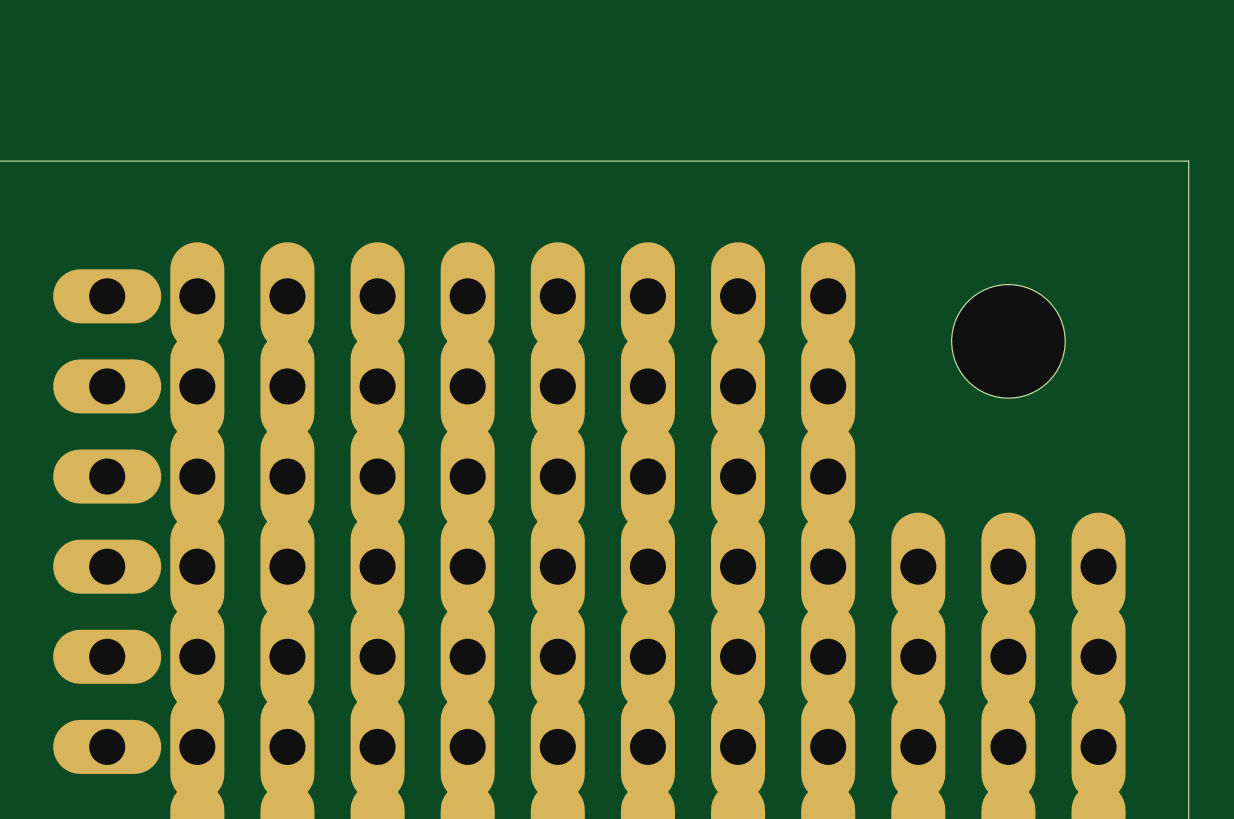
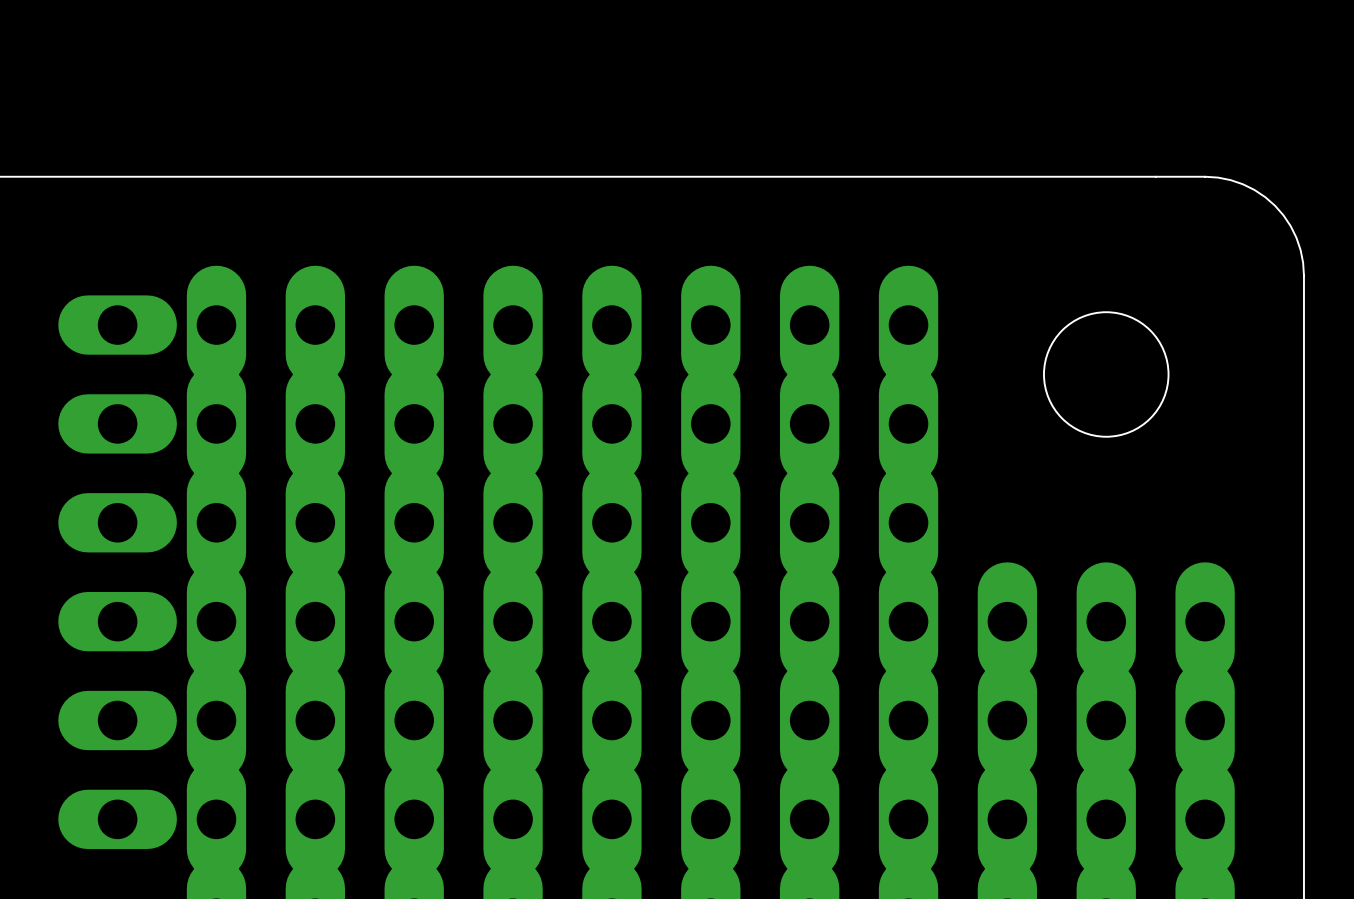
board edge: (1098, 161) (1188, 161) (1188, 251) -> (1205, 176) (1230, 180) (1242, 184) (1265, 197) (1275, 205) (1283, 215) (1296, 237) (1300, 250) (1303, 275)

